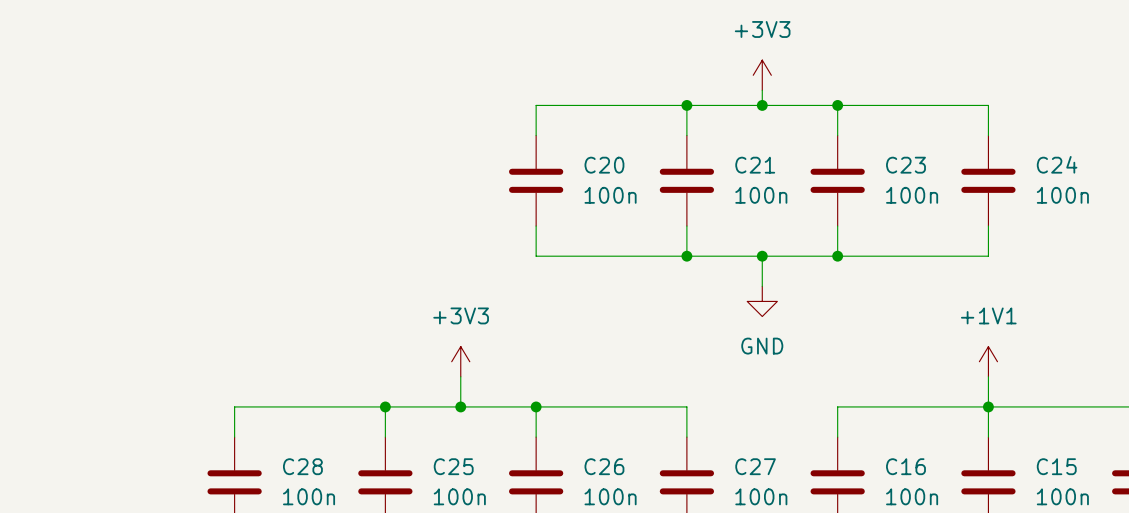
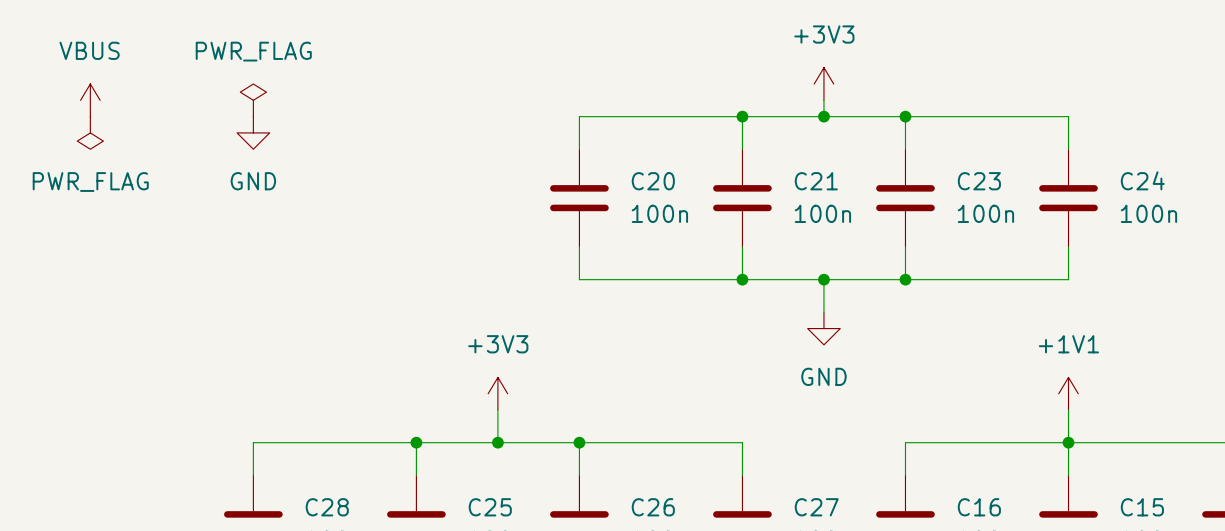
power symbol: none -> VBUS (90, 100)
power symbol: none -> PWR_FLAG (253, 100)
power symbol: none -> PWR_FLAG (90, 132)
power symbol: none -> GND (253, 132)

